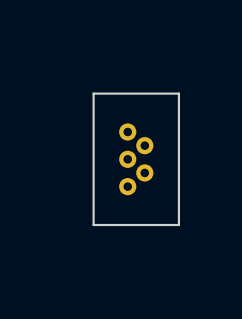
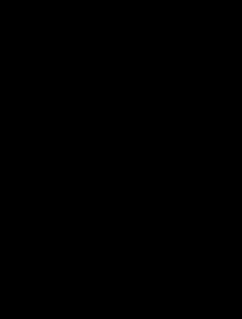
part: (136, 159) -> none

